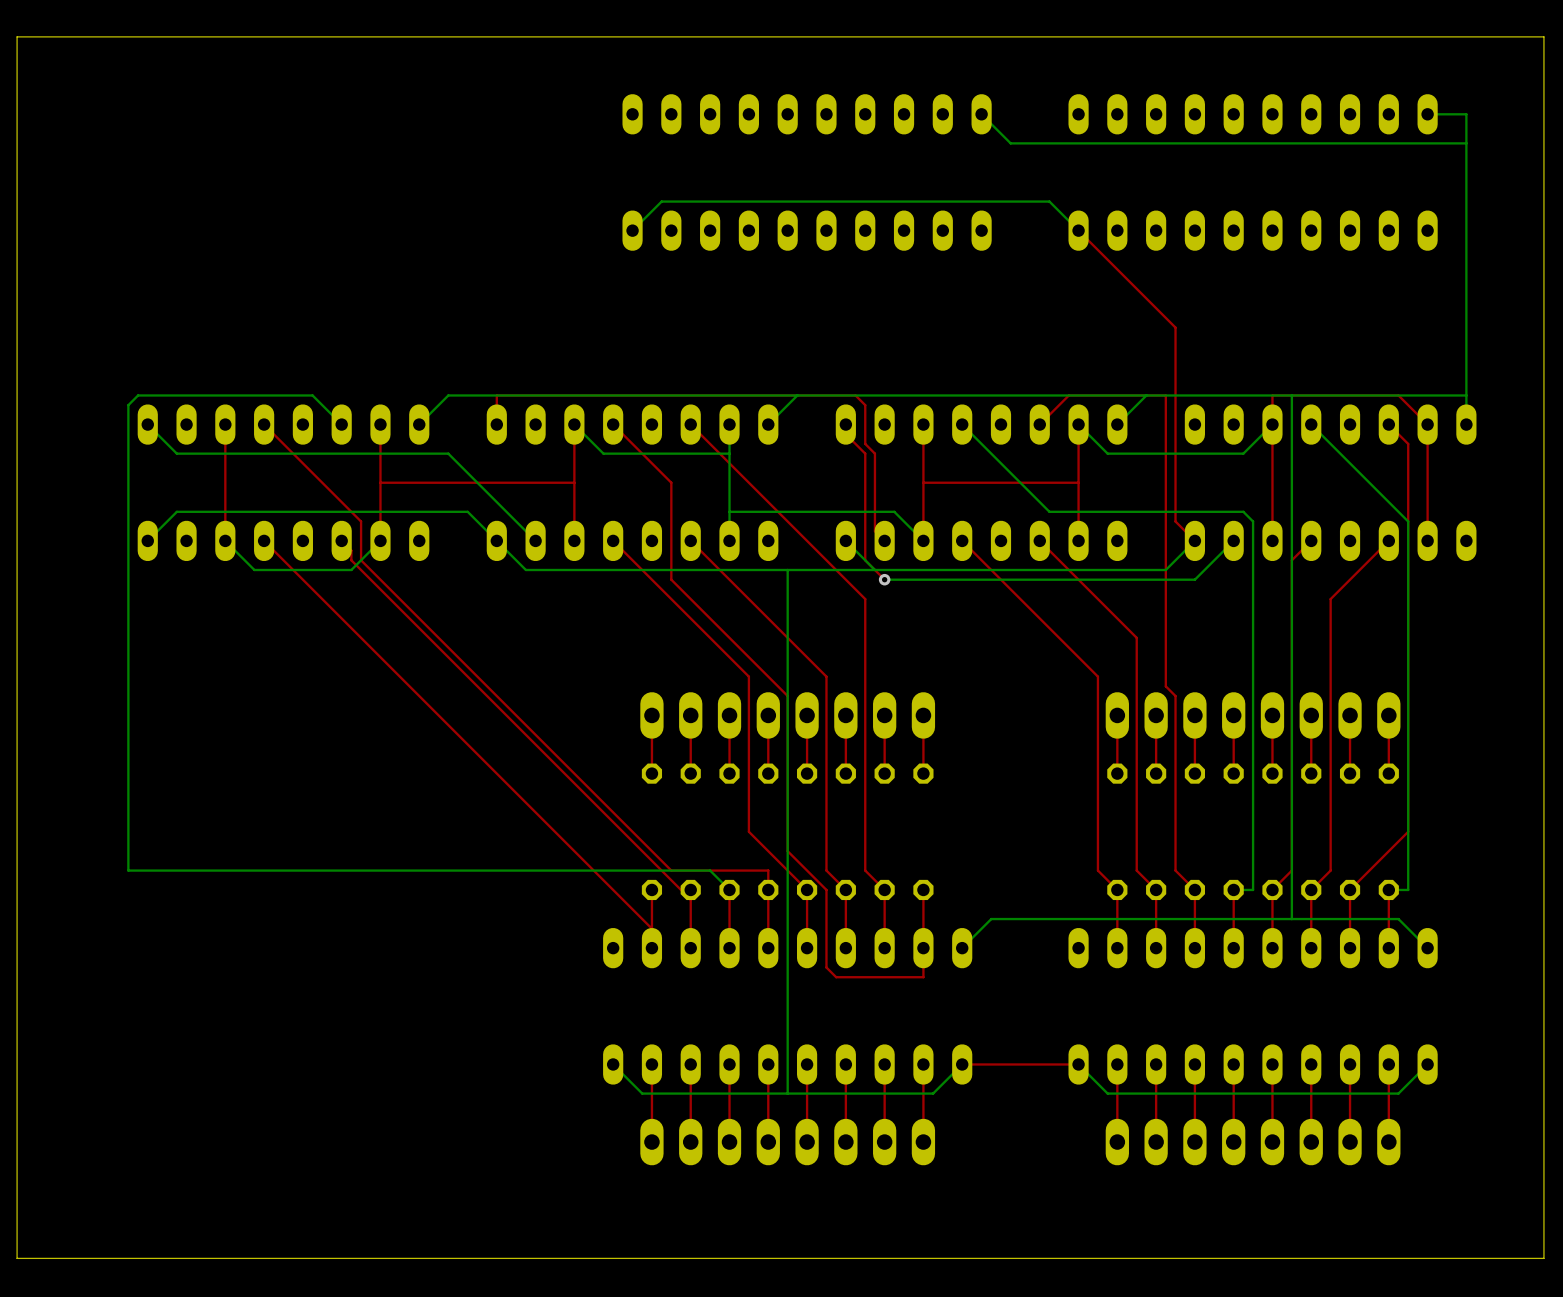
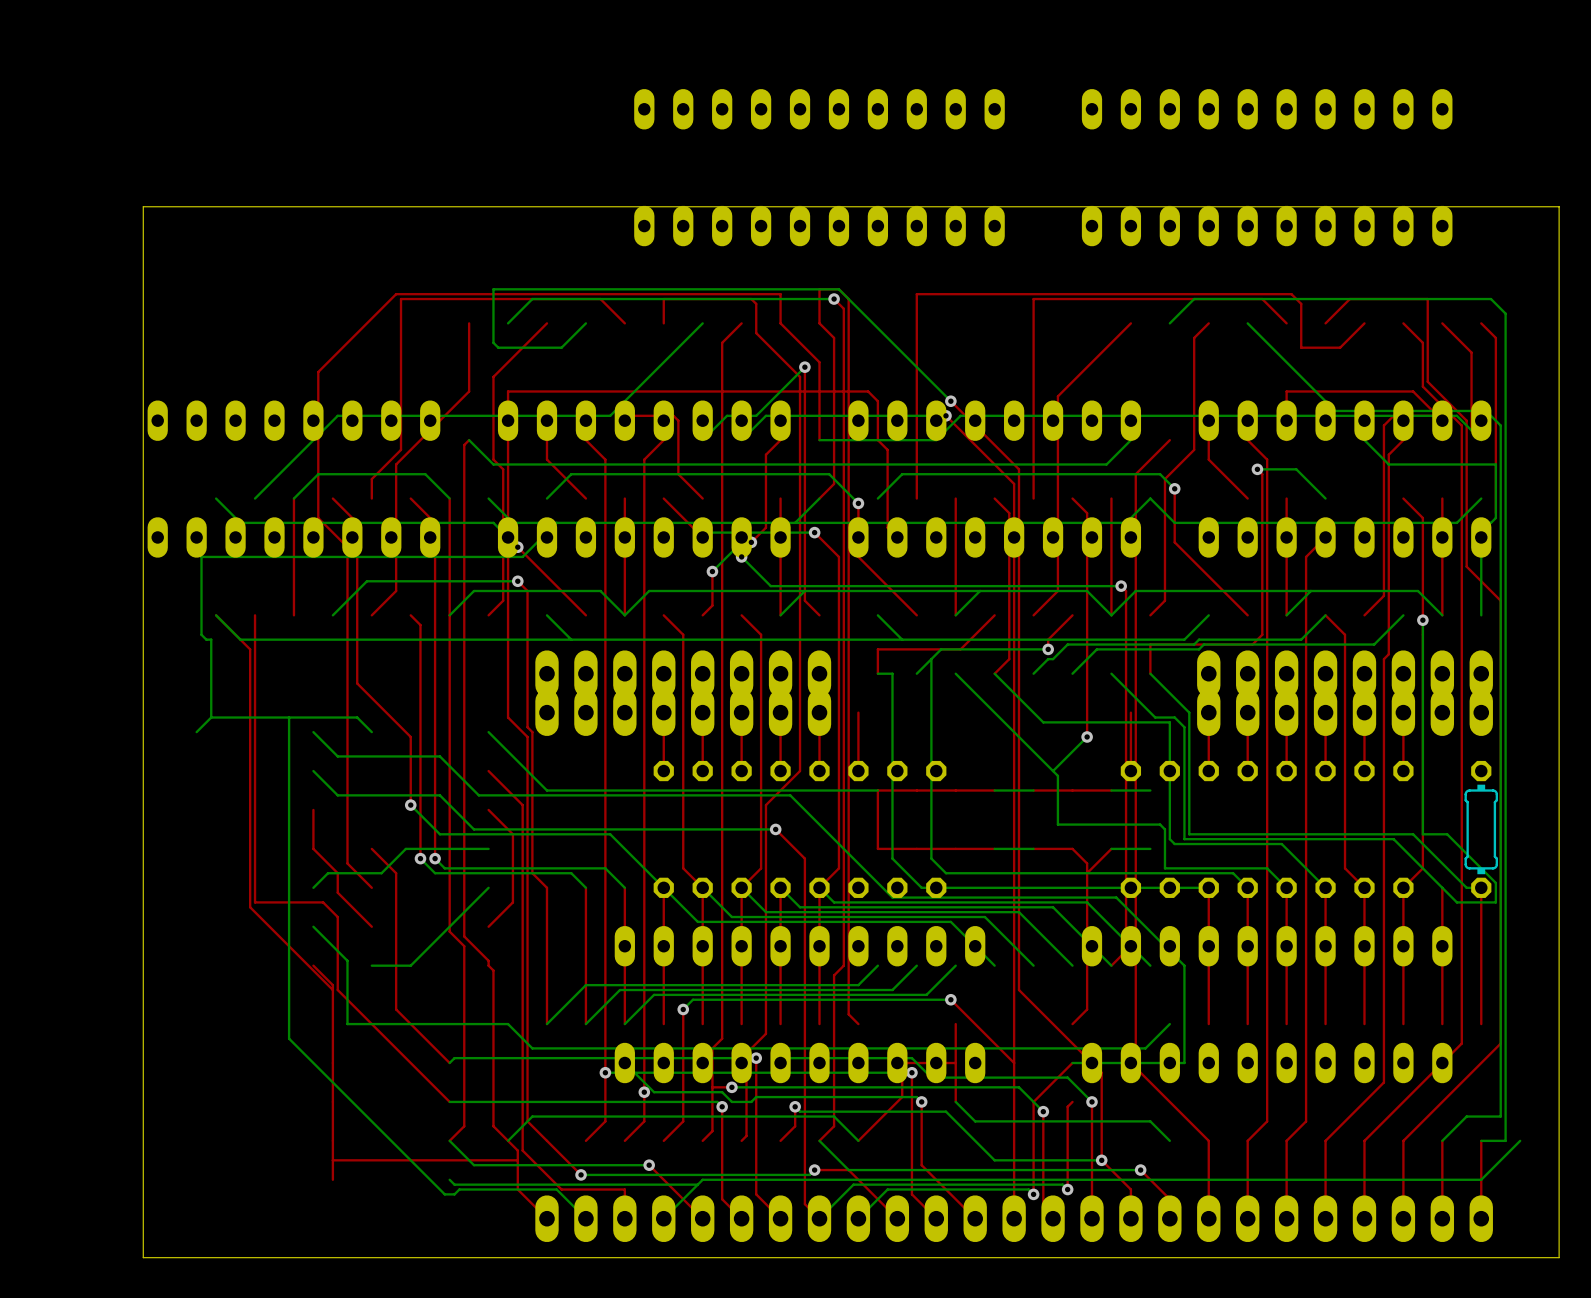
bottom track: (981, 114) (1010, 143) (1466, 143) -> none
bottom track: (1427, 114) (1466, 114) (1466, 424) -> none
board edge: (1543, 211) (1543, 36) (17, 36) (17, 1258) (133, 1258) -> (1559, 206) (143, 206) (143, 1257)
bottom track: (1078, 230) (1049, 201) (661, 201) (632, 230) -> none
top track: (1078, 230) (1175, 327) (1175, 521) (1194, 540) -> none
bottom track: none -> (834, 299) (532, 299) (508, 323)
via: none -> (834, 299)
top track: none -> (469, 323) (469, 391) (396, 464) (396, 591) (371, 615)
top track: none -> (546, 323) (493, 376) (493, 459) (503, 469) (503, 600) (488, 615)
bottom track: none -> (585, 323) (561, 347) (498, 347) (493, 342) (493, 289) (838, 289) (950, 401)
top track: none -> (624, 323) (600, 299) (401, 299) (401, 449) (371, 479) (371, 498)
bottom track: none -> (702, 323) (610, 415) (337, 415) (255, 498)
top track: none -> (1130, 323) (1057, 396) (1057, 591) (1033, 615)
bottom track: none -> (1169, 323) (1194, 299) (1491, 299) (1505, 313) (1505, 1140) (1481, 1140)
top track: none -> (1208, 323) (1194, 337) (1194, 449) (1164, 479) (1164, 600) (1150, 615)
bottom track: none -> (1247, 323) (1335, 410) (1486, 410) (1500, 425) (1500, 1116) (1466, 1116) (1442, 1140)
top track: none -> (1286, 323) (1262, 299) (1033, 299) (1033, 498)
top track: none -> (1325, 323) (1349, 299) (1427, 299) (1427, 381) (1466, 420) (1466, 566) (1500, 600) (1500, 1043) (1403, 1140) (1403, 1218)
top track: none -> (1364, 323) (1340, 347) (1301, 347) (1301, 303) (1291, 294) (916, 294) (916, 498)
top track: none -> (1403, 323) (1422, 342) (1422, 386) (1461, 425) (1461, 1043) (1364, 1140) (1364, 1218)
top track: none -> (1442, 323) (1471, 352) (1471, 430) (1481, 440)
top track: none -> (1481, 323) (1495, 337) (1495, 513)
bottom track: none -> (804, 367) (756, 415) (727, 415) (702, 440)
top track: none -> (804, 367) (804, 600) (819, 615)
via: none -> (804, 367)
bottom track: (797, 395) (768, 424) -> none
bottom track: (1146, 395) (1117, 424) -> none
bottom track: (1291, 395) (1291, 919) -> none
bottom track: (1466, 395) (448, 395) (419, 424) -> none
top track: none -> (950, 401) (1018, 469) (1018, 990) (1101, 1072) (1101, 1160) (1130, 1189) (1130, 1218)
via: none -> (950, 401)
bottom track: none -> (946, 415) (765, 415) (741, 440)
top track: none -> (946, 415) (1014, 483) (1014, 1218)
via: none -> (946, 415)
bottom track: (147, 424) (176, 453) (448, 453) (535, 540) -> none
top track: (225, 424) (225, 540) -> (293, 498) (293, 615)
top track: (264, 424) (361, 521) (361, 560) (671, 870) (768, 870) (768, 889) -> none
bottom track: (341, 424) (312, 395) (138, 395) (128, 405) (128, 870) (433, 870) -> (435, 858) (444, 868)
top track: (380, 424) (380, 540) -> (624, 498) (624, 615)
bottom track: (574, 424) (603, 453) (729, 453) -> none
top track: (574, 424) (574, 540) -> (780, 498) (780, 615)
top track: (613, 424) (666, 477) -> (624, 440) (624, 415) (673, 415) (678, 420) (678, 474)
top track: (690, 424) (802, 536) -> none
bottom track: (729, 424) (729, 540) -> none
top track: (845, 424) (845, 434) (865, 453) (865, 560) (884, 579) -> none
top track: (923, 424) (923, 540) -> (955, 498) (955, 615)
bottom track: (962, 424) (1049, 511) (1243, 511) (1253, 521) (1253, 889) (1233, 889) -> (931, 659) (931, 858) (946, 873) (1233, 873) (1247, 887)
top track: (1039, 424) (1068, 395) (1165, 395) (1165, 686) (1175, 696) (1175, 870) (1194, 889) -> none
top track: (1078, 424) (1078, 540) -> (1111, 498) (1111, 615)
bottom track: (1272, 424) (1243, 453) (1107, 453) (1078, 424) -> none
bottom track: (1311, 424) (1408, 521) (1408, 623) -> none
top track: (1388, 424) (1408, 443) (1408, 521) -> (1403, 498) (1422, 518)
top track: none -> (1442, 420) (1442, 415) (1393, 415) (1383, 425) (1383, 595) (1364, 615)
top track: none -> (469, 440) (464, 445) (464, 936) (488, 960) (488, 965) (493, 970) (493, 1126) (517, 1150) (517, 1189) (546, 1218)
top track: none -> (508, 440) (508, 717) (527, 736) (527, 1121) (581, 1174)
top track: none -> (546, 440) (546, 459) (585, 498)
top track: none -> (585, 440) (605, 459) (605, 1121) (585, 1140)
top track: none -> (663, 440) (644, 459) (644, 1121) (624, 1140)
top track: none -> (780, 440) (765, 454) (765, 527) (751, 542)
top track: none -> (819, 440) (819, 362) (780, 323) (780, 294) (396, 294) (318, 372) (318, 518) (347, 547) (347, 863) (371, 887)
bottom track: none -> (1130, 440) (1106, 464) (493, 464) (469, 440)
top track: none -> (1169, 440) (1135, 474) (1135, 1067) (1208, 1140) (1208, 1218)
top track: none -> (1208, 440) (1208, 459) (1247, 498)
top track: none -> (1247, 440) (1267, 459) (1267, 1121) (1247, 1140) (1247, 1218)
top track: (1272, 443) (1272, 502) -> none
bottom track: none -> (1364, 440) (1388, 464) (1495, 464) (1495, 518) (1491, 522) (1481, 522) (1481, 615)
top track: none -> (1403, 440) (1388, 454) (1388, 654) (1383, 659) (1383, 1082) (1325, 1140) (1325, 1218)
top track: (1427, 443) (1427, 502) -> none
bottom track: none -> (1481, 440) (1456, 415) (960, 415) (936, 440) (819, 440)
bottom track: none -> (1257, 469) (1296, 469) (1325, 498)
via: none -> (1257, 469)
top track: (574, 482) (380, 482) -> none
top track: (671, 482) (671, 579) (787, 696) -> (663, 323) (663, 299) (751, 299) (756, 303) (756, 333) (800, 376) (800, 693)
top track: none -> (683, 479) (702, 498)
top track: (1078, 482) (923, 482) -> none
bottom track: none -> (1174, 488) (1160, 474) (902, 474) (877, 498)
top track: none -> (1174, 488) (1174, 542) (1247, 615)
via: none -> (1174, 488)
top track: none -> (332, 498) (357, 522) (357, 683) (410, 736) (410, 805)
top track: none -> (410, 498) (435, 522) (435, 858)
bottom track: none -> (449, 498) (425, 474) (318, 474) (293, 498)
top track: none -> (449, 498) (449, 931) (464, 946) (464, 1126) (449, 1140)
bottom track: none -> (546, 498) (571, 474) (829, 474) (858, 503)
top track: none -> (663, 498) (697, 532)
bottom track: none -> (819, 498) (795, 522)
top track: none -> (819, 498) (834, 483) (834, 337) (819, 323) (819, 289) (838, 289) (848, 299) (848, 1014) (858, 1024)
top track: none -> (994, 498) (1009, 513) (1009, 659) (994, 673)
top track: none -> (1072, 498) (1087, 513) (1087, 736)
bottom track: none -> (1481, 498) (1456, 522) (1174, 522) (1150, 498) (1126, 522) (512, 522) (488, 498)
top track: none -> (858, 503) (858, 556) (916, 615)
via: none -> (858, 503)
bottom track: (729, 511) (894, 511) (923, 540) -> none
bottom track: (482, 526) (467, 511) (176, 511) (147, 540) -> (493, 522) (240, 522) (216, 498)
bottom track: none -> (556, 522) (522, 556) (201, 556) (201, 634) (206, 639) (211, 639) (211, 717)
bottom track: none -> (814, 532) (697, 532)
via: none -> (814, 532)
top track: (264, 540) (651, 928) -> none
top track: (341, 540) (351, 550) (351, 560) (690, 899) -> none
bottom track: (380, 540) (351, 570) (254, 570) (225, 540) -> none
top track: (613, 540) (748, 676) -> (741, 615) (761, 634) (761, 673)
top track: (690, 540) (826, 676) -> none
bottom track: (845, 540) (874, 570) -> none
top track: (962, 540) (1097, 676) (1097, 870) (1117, 889) (1117, 948) -> none
top track: (1039, 540) (1136, 637) (1136, 647) -> (1257, 469) (1262, 474) (1262, 634) (1252, 644) (1150, 644)
bottom track: (1194, 540) (1165, 570) (525, 570) (506, 550) -> none
bottom track: (1233, 540) (1194, 579) (884, 579) -> none
top track: none -> (1286, 537) (1286, 615)
top track: (1388, 540) (1330, 599) (1330, 637) -> (1325, 615) (1345, 634)
top track: none -> (1442, 537) (1442, 615)
bottom track: none -> (751, 542) (741, 542) (712, 571)
via: none -> (751, 542)
top track: none -> (517, 547) (585, 615)
via: none -> (517, 547)
bottom track: none -> (741, 556) (770, 586) (1121, 586)
via: none -> (741, 556)
top track: (826, 560) (865, 599) (865, 652) -> (838, 556) (838, 673)
bottom track: (787, 570) (787, 1093) -> none
top track: none -> (712, 571) (712, 605) (702, 615)
via: none -> (712, 571)
via: (884, 579) -> none
bottom track: none -> (517, 581) (366, 581) (332, 615)
top track: none -> (517, 581) (527, 591) (527, 727) (532, 732) (532, 873) (546, 887) (546, 1024)
via: none -> (517, 581)
top track: none -> (1121, 586) (1126, 591) (1126, 951) (1111, 965)
via: none -> (1121, 586)
bottom track: none -> (804, 591) (780, 615)
bottom track: none -> (980, 591) (955, 615)
bottom track: none -> (1310, 591) (1286, 615)
top track: none -> (216, 615) (250, 649) (250, 907) (332, 990)
top track: none -> (255, 615) (255, 902) (323, 902) (337, 917) (337, 990) (449, 1101)
top track: none -> (410, 615) (420, 625) (420, 858)
bottom track: none -> (546, 615) (571, 639)
top track: none -> (663, 615) (683, 634) (683, 868) (702, 887)
bottom track: none -> (877, 615) (902, 639)
top track: none -> (994, 615) (960, 649) (877, 649)
top track: none -> (1072, 615) (1048, 639) (1048, 649)
bottom track: none -> (1208, 615) (1184, 639) (240, 639) (216, 615)
bottom track: none -> (1325, 615) (1301, 639) (1199, 639) (1194, 644) (1067, 644) (1053, 659) (1048, 659) (1033, 673)
bottom track: none -> (1403, 615) (1374, 644) (1203, 644) (1199, 649) (1096, 649) (1072, 673)
bottom track: none -> (1442, 615) (1418, 591) (1135, 591) (1111, 615) (1087, 591) (649, 591) (624, 615) (600, 591) (474, 591) (449, 615)
via: none -> (1422, 620)
bottom track: none -> (1048, 649) (941, 649) (916, 673)
via: none -> (1048, 649)
part: none -> (683, 673)
bottom track: none -> (877, 673) (892, 673) (892, 858) (921, 887) (1208, 887)
top track: (865, 676) (865, 793) -> (994, 790) (877, 790)
bottom track: none -> (955, 673) (1057, 775) (1057, 824) (1160, 824) (1164, 829) (1164, 868) (1267, 868) (1286, 887)
bottom track: none -> (994, 673) (1043, 722) (1169, 722) (1169, 839) (1174, 844) (1281, 844) (1325, 887)
bottom track: none -> (1150, 673) (1189, 712) (1189, 834) (1413, 834) (1466, 887) (1481, 887)
top track: (1136, 676) (1136, 870) (1156, 889) (1156, 948) -> none
part: none -> (1345, 673)
part: none -> (683, 712)
part: (787, 715) -> none
top track: (884, 715) (884, 773) -> none
top track: (923, 715) (923, 773) -> none
top track: (1156, 715) (1156, 773) -> none
part: (1253, 715) -> none
part: none -> (1345, 712)
bottom track: none -> (211, 717) (357, 717) (371, 732)
bottom track: none -> (211, 717) (196, 732)
bottom track: none -> (289, 717) (289, 1038) (444, 1194) (454, 1194) (459, 1189) (556, 1189) (585, 1218)
bottom track: none -> (313, 732) (337, 756) (439, 756) (478, 795) (790, 795) (892, 897) (1116, 897) (1184, 965) (1184, 1063) (1072, 1063)
bottom track: none -> (488, 732) (546, 790) (877, 790)
bottom track: none -> (1087, 736) (1053, 771)
via: none -> (1087, 736)
bottom track: none -> (313, 771) (337, 795) (439, 795) (474, 829) (775, 829)
top track: none -> (488, 771) (522, 805) (522, 1150) (561, 1189) (624, 1189) (624, 1218)
top track: (787, 773) (787, 851) (826, 889) (826, 967) (836, 977) (923, 977) (923, 889) -> none
bottom track: none -> (1033, 790) (994, 790)
top track: none -> (1111, 790) (1033, 790)
bottom track: none -> (1150, 790) (1111, 790)
bottom track: none -> (410, 805) (439, 834) (610, 834) (697, 921) (950, 921) (994, 965)
via: none -> (410, 805)
top track: none -> (313, 809) (313, 848) (337, 873) (337, 892) (371, 926)
top track: none -> (488, 809) (512, 834) (512, 902) (488, 926)
top track: (748, 831) (807, 889) -> (761, 829) (761, 868) (741, 887)
top track: none -> (775, 829) (804, 858) (804, 1204) (819, 1218)
via: none -> (775, 829)
top track: (1408, 831) (1350, 889) -> (1422, 829) (1422, 868) (1403, 887)
part: none -> (1481, 829)
bottom track: (1408, 836) (1408, 889) (1388, 889) -> (1422, 834) (1447, 834) (1495, 882) (1495, 902) (1456, 902) (1393, 839) (1184, 839) (1184, 727) (1174, 717) (1155, 717) (1111, 673)
top track: none -> (371, 848) (396, 873) (396, 1009) (449, 1063)
bottom track: none -> (488, 848) (405, 848) (381, 873) (328, 873) (313, 887)
top track: (865, 851) (865, 870) (884, 889) (884, 948) -> (877, 848) (994, 848)
bottom track: none -> (1033, 848) (994, 848)
top track: none -> (1033, 848) (1072, 848) (1087, 863) (1087, 1009) (1072, 1024)
top track: none -> (1111, 848) (1087, 873)
bottom track: none -> (1150, 848) (1111, 848)
bottom track: none -> (420, 858) (435, 873) (571, 873) (585, 887)
via: none -> (420, 858)
via: none -> (435, 858)
bottom track: (593, 870) (710, 870) (729, 889) -> (605, 868) (624, 887)
top track: (826, 870) (845, 889) (845, 948) -> (838, 868) (819, 887)
top track: (1291, 870) (1272, 889) -> (1306, 868) (1306, 1121) (1286, 1140) (1286, 1218)
top track: (1330, 870) (1311, 889) -> (1345, 868) (1364, 887)
bottom track: none -> (488, 887) (410, 965) (371, 965)
top track: none -> (585, 887) (585, 1024)
top track: none -> (624, 887) (624, 1024)
bottom track: none -> (702, 887) (731, 917) (984, 917) (1033, 965)
bottom track: none -> (741, 887) (765, 912) (1018, 912) (1072, 965)
bottom track: none -> (780, 887) (800, 907) (1053, 907) (1111, 965)
bottom track: none -> (819, 887) (834, 902) (1087, 902) (1150, 965)
top track: none -> (1442, 887) (1442, 1024)
top track: none -> (1481, 887) (1481, 1024)
bottom track: none -> (313, 926) (347, 960) (347, 1024) (508, 1024) (532, 1048) (1145, 1048) (1169, 1024)
top track: none -> (663, 946) (663, 1024)
top track: none -> (702, 946) (702, 1024)
top track: none -> (741, 946) (741, 1024)
bottom track: (1427, 948) (1398, 919) (991, 919) (962, 948) -> none
top track: none -> (313, 965) (332, 985) (332, 1179)
bottom track: none -> (877, 965) (858, 985) (585, 985) (546, 1024)
bottom track: none -> (916, 965) (892, 990) (619, 990) (585, 1024)
bottom track: none -> (955, 965) (926, 994) (654, 994) (624, 1024)
bottom track: none -> (950, 999) (692, 999) (683, 1009)
top track: none -> (950, 999) (1014, 1063)
via: none -> (950, 999)
via: none -> (683, 1009)
bottom track: none -> (756, 1058) (454, 1058) (449, 1063)
top track: none -> (756, 1058) (756, 1194) (780, 1218)
via: none -> (756, 1058)
bottom track: none -> (780, 1058) (911, 1058) (931, 1077) (1067, 1077) (1091, 1101)
top track: (651, 1064) (651, 1142) -> (683, 1009) (683, 1121) (663, 1140)
top track: (690, 1064) (690, 1142) -> (741, 323) (722, 342) (722, 1038) (712, 1048) (712, 1131) (702, 1140)
top track: (729, 1064) (729, 1142) -> (800, 771) (765, 805) (765, 1033) (746, 1053) (746, 1135) (741, 1140)
top track: (768, 1064) (768, 1142) -> (795, 1106) (795, 1126) (780, 1140)
top track: (807, 1064) (807, 1142) -> (834, 299) (843, 308) (843, 965) (834, 975) (834, 1126) (819, 1140)
top track: (845, 1064) (845, 1142) -> (955, 1063) (907, 1063) (902, 1067) (902, 1097) (858, 1140)
top track: (884, 1064) (884, 1142) -> (819, 946) (819, 1024)
top track: (923, 1064) (923, 1142) -> (780, 946) (780, 1024)
bottom track: (962, 1064) (933, 1093) (710, 1093) -> (921, 1101) (916, 1097) (756, 1097) (751, 1101) (731, 1101) (722, 1092)
top track: none -> (1072, 1063) (1033, 1101) (1033, 1194)
top track: (1078, 1064) (962, 1064) -> none
top track: (1117, 1064) (1117, 1142) -> (955, 1024) (955, 1101)
top track: (1156, 1064) (1156, 1142) -> (1442, 1140) (1442, 1218)
top track: (1194, 1064) (1194, 1142) -> (1208, 946) (1208, 1024)
top track: (1233, 1064) (1233, 1142) -> (1247, 946) (1247, 1024)
top track: (1272, 1064) (1272, 1142) -> (1286, 946) (1286, 1024)
top track: (1311, 1064) (1311, 1142) -> (1325, 946) (1325, 1024)
top track: (1350, 1064) (1350, 1142) -> (1364, 946) (1364, 1024)
top track: (1388, 1064) (1388, 1142) -> (1403, 946) (1403, 1024)
bottom track: (1427, 1064) (1398, 1093) (1107, 1093) (1078, 1064) -> none
via: none -> (605, 1072)
bottom track: none -> (911, 1072) (605, 1072)
top track: none -> (911, 1072) (911, 1194) (936, 1218)
via: none -> (911, 1072)
bottom track: none -> (731, 1087) (1018, 1087) (1043, 1111)
top track: none -> (731, 1087) (712, 1087)
via: none -> (731, 1087)
via: none -> (644, 1092)
bottom track: none -> (449, 1101) (717, 1101) (722, 1106)
top track: none -> (921, 1101) (921, 1165) (975, 1218)
via: none -> (921, 1101)
bottom track: none -> (955, 1101) (975, 1121) (1150, 1121) (1169, 1140)
top track: none -> (1072, 1101) (1067, 1106) (1067, 1189)
top track: none -> (1091, 1101) (1091, 1218)
via: none -> (1091, 1101)
top track: none -> (722, 1106) (722, 1199) (741, 1218)
via: none -> (722, 1106)
bottom track: none -> (795, 1106) (800, 1111) (946, 1111) (994, 1160) (1101, 1160)
via: none -> (795, 1106)
top track: none -> (1043, 1111) (1043, 1208) (1053, 1218)
via: none -> (1043, 1111)
bottom track: none -> (449, 1140) (474, 1165) (649, 1165)
part: (787, 1142) -> none
bottom track: none -> (819, 1140) (848, 1170) (1140, 1170)
bottom track: none -> (858, 1140) (834, 1116) (532, 1116) (508, 1140)
part position: (1253, 1142) -> (1345, 1218)
top track: none -> (1481, 1140) (1481, 1218)
bottom track: none -> (1520, 1140) (1481, 1179) (702, 1179) (663, 1218)
top track: none -> (517, 1160) (332, 1160)
via: none -> (1101, 1160)
top track: none -> (649, 1165) (702, 1218)
via: none -> (649, 1165)
bottom track: none -> (814, 1170) (809, 1174) (581, 1174)
top track: none -> (814, 1170) (848, 1170) (897, 1218)
via: none -> (814, 1170)
top track: none -> (1140, 1170) (1169, 1199) (1169, 1218)
via: none -> (1140, 1170)
via: none -> (581, 1174)
bottom track: none -> (449, 1179) (454, 1184) (697, 1184)
bottom track: none -> (1067, 1189) (1062, 1184) (853, 1184) (819, 1218)
via: none -> (1067, 1189)
bottom track: none -> (1033, 1194) (1028, 1189) (887, 1189) (858, 1218)
via: none -> (1033, 1194)
part: none -> (566, 1218)
part: none -> (741, 1218)
part: none -> (1033, 1218)

